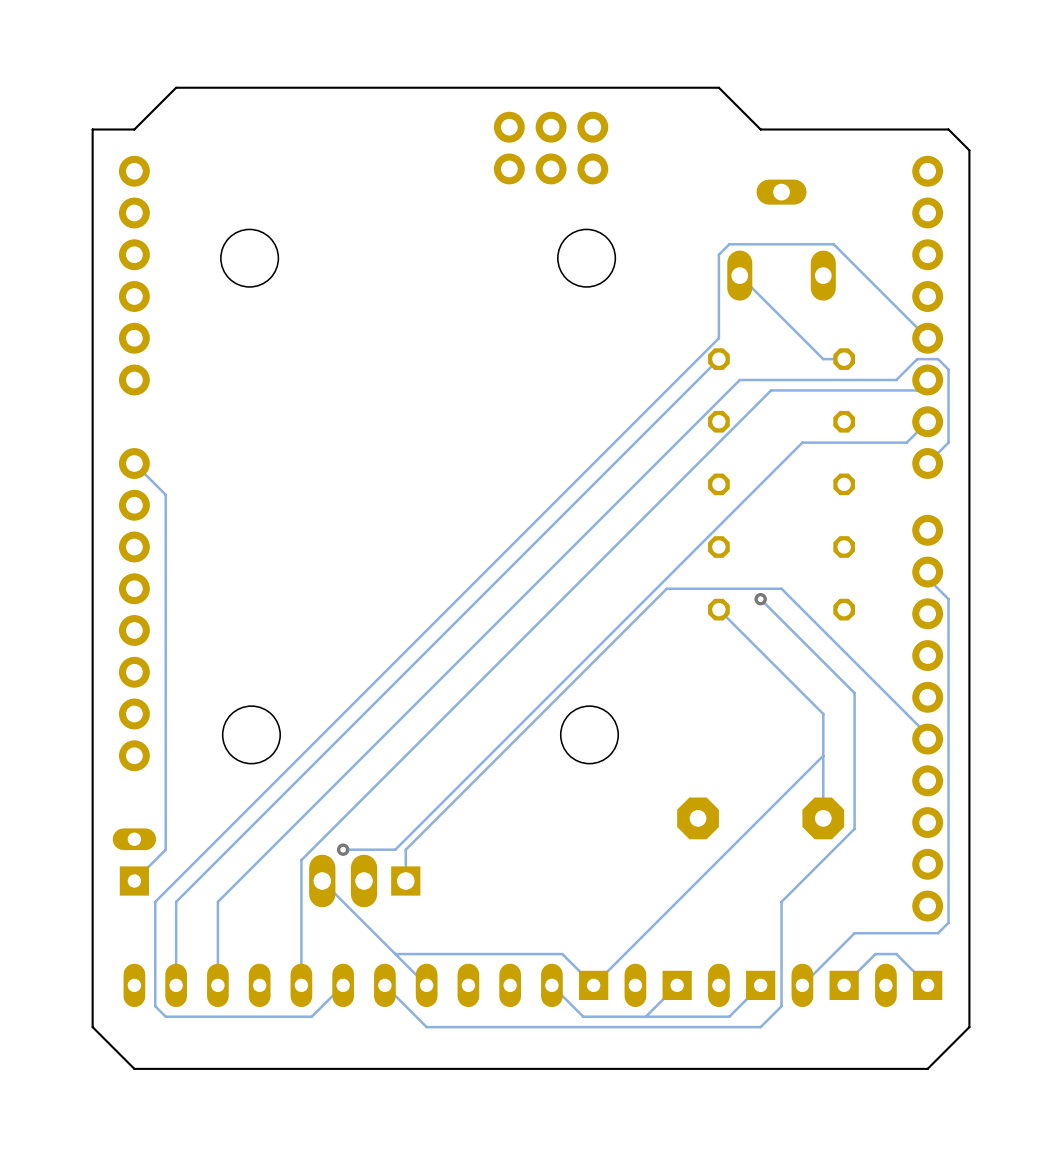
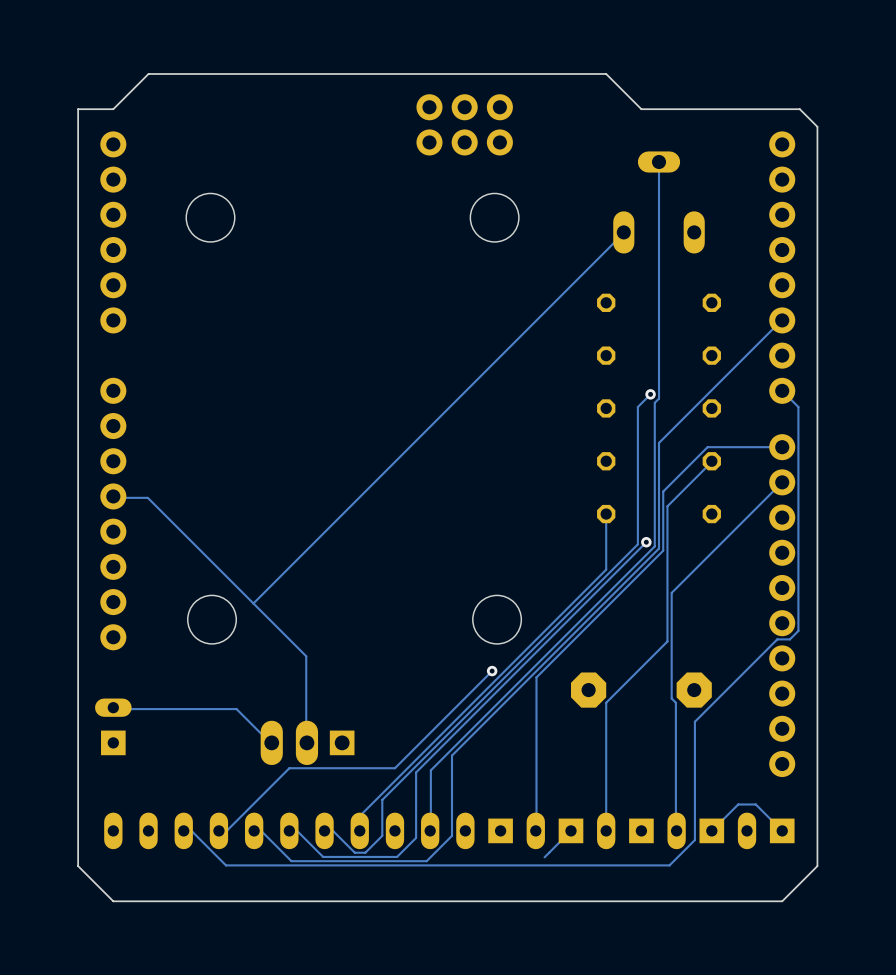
track: none -> (659, 162) (659, 398) (654, 402) (654, 546) (430, 770) (430, 830)
track: (739, 275) (823, 359) (844, 359) -> (623, 232) (253, 603)
track: (927, 338) (833, 244) (729, 244) (718, 254) (718, 338) (155, 901) (155, 1006) (165, 1016) (311, 1016) (343, 985) -> (646, 542) (416, 772) (416, 837) (397, 856) (323, 856) (297, 831) (289, 830)
track: (718, 359) (176, 901) (176, 985) -> none
track: (927, 380) (917, 390) (771, 390) (301, 860) (301, 985) -> (782, 320) (659, 442) (659, 548) (452, 755) (452, 835) (426, 861) (291, 861) (261, 831) (254, 830)
track: (927, 421) (906, 442) (802, 442) (395, 849) (343, 849) -> none
track: (134, 463) (165, 494) (165, 849) (134, 881) -> none
track: (927, 463) (948, 442) (948, 369) (938, 359) (917, 359) (896, 380) (739, 380) (217, 901) (217, 985) -> (782, 390) (798, 407) (798, 630) (789, 639) (777, 639) (694, 721) (694, 840) (669, 865) (225, 865) (192, 831) (183, 830)
via: none -> (650, 394)
track: none -> (782, 447) (707, 447) (663, 491) (663, 550) (536, 677) (535, 830)
track: none -> (711, 461) (667, 506) (667, 641) (606, 702) (606, 830)
track: (927, 572) (927, 578) (948, 599) (948, 922) (938, 933) (854, 933) (802, 985) -> (782, 482) (671, 592) (671, 698) (675, 702) (676, 830)
track: none -> (113, 496) (147, 497) (306, 656) (306, 742)
track: (760, 599) (854, 693) (854, 828) (781, 901) (781, 1006) (760, 1027) (426, 1027) (385, 986) -> (650, 394) (637, 407) (637, 544) (382, 799) (382, 835) (365, 852) (354, 852) (333, 831) (325, 831)
via position: (760, 599) -> (646, 542)
track: (718, 609) (823, 714) (823, 818) -> (606, 514) (606, 569) (361, 814) (359, 830)
track: (927, 739) (927, 734) (781, 588) (666, 588) (405, 849) (405, 881) -> none
track: (823, 755) (593, 985) (562, 954) (395, 954) -> none
track: none -> (492, 671) (394, 768) (289, 768) (228, 829) (218, 830)
via: none -> (492, 671)
via: (343, 849) -> none
track: (322, 881) (426, 985) -> (271, 742) (236, 709) (113, 707)
track: (760, 985) (729, 1016) (583, 1016) (551, 985) -> none

